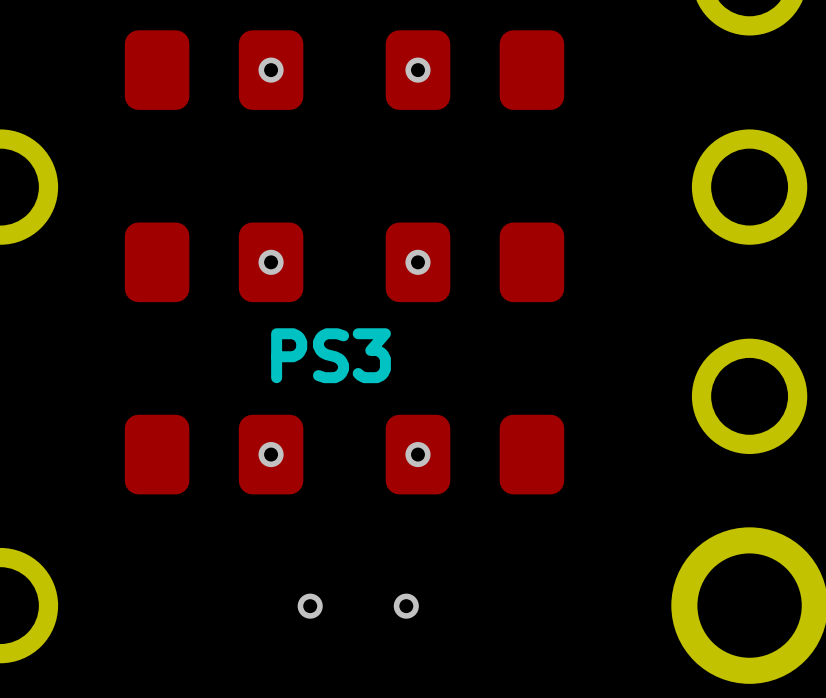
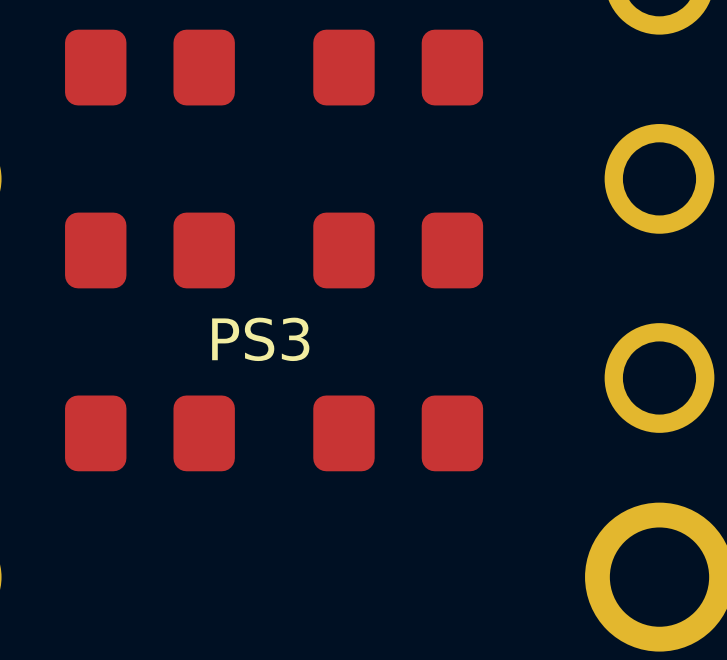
via: (271, 70) -> none
via: (417, 70) -> none
via: (271, 262) -> none
via: (417, 262) -> none
via: (271, 454) -> none
via: (417, 454) -> none
via: (310, 606) -> none
via: (406, 606) -> none

